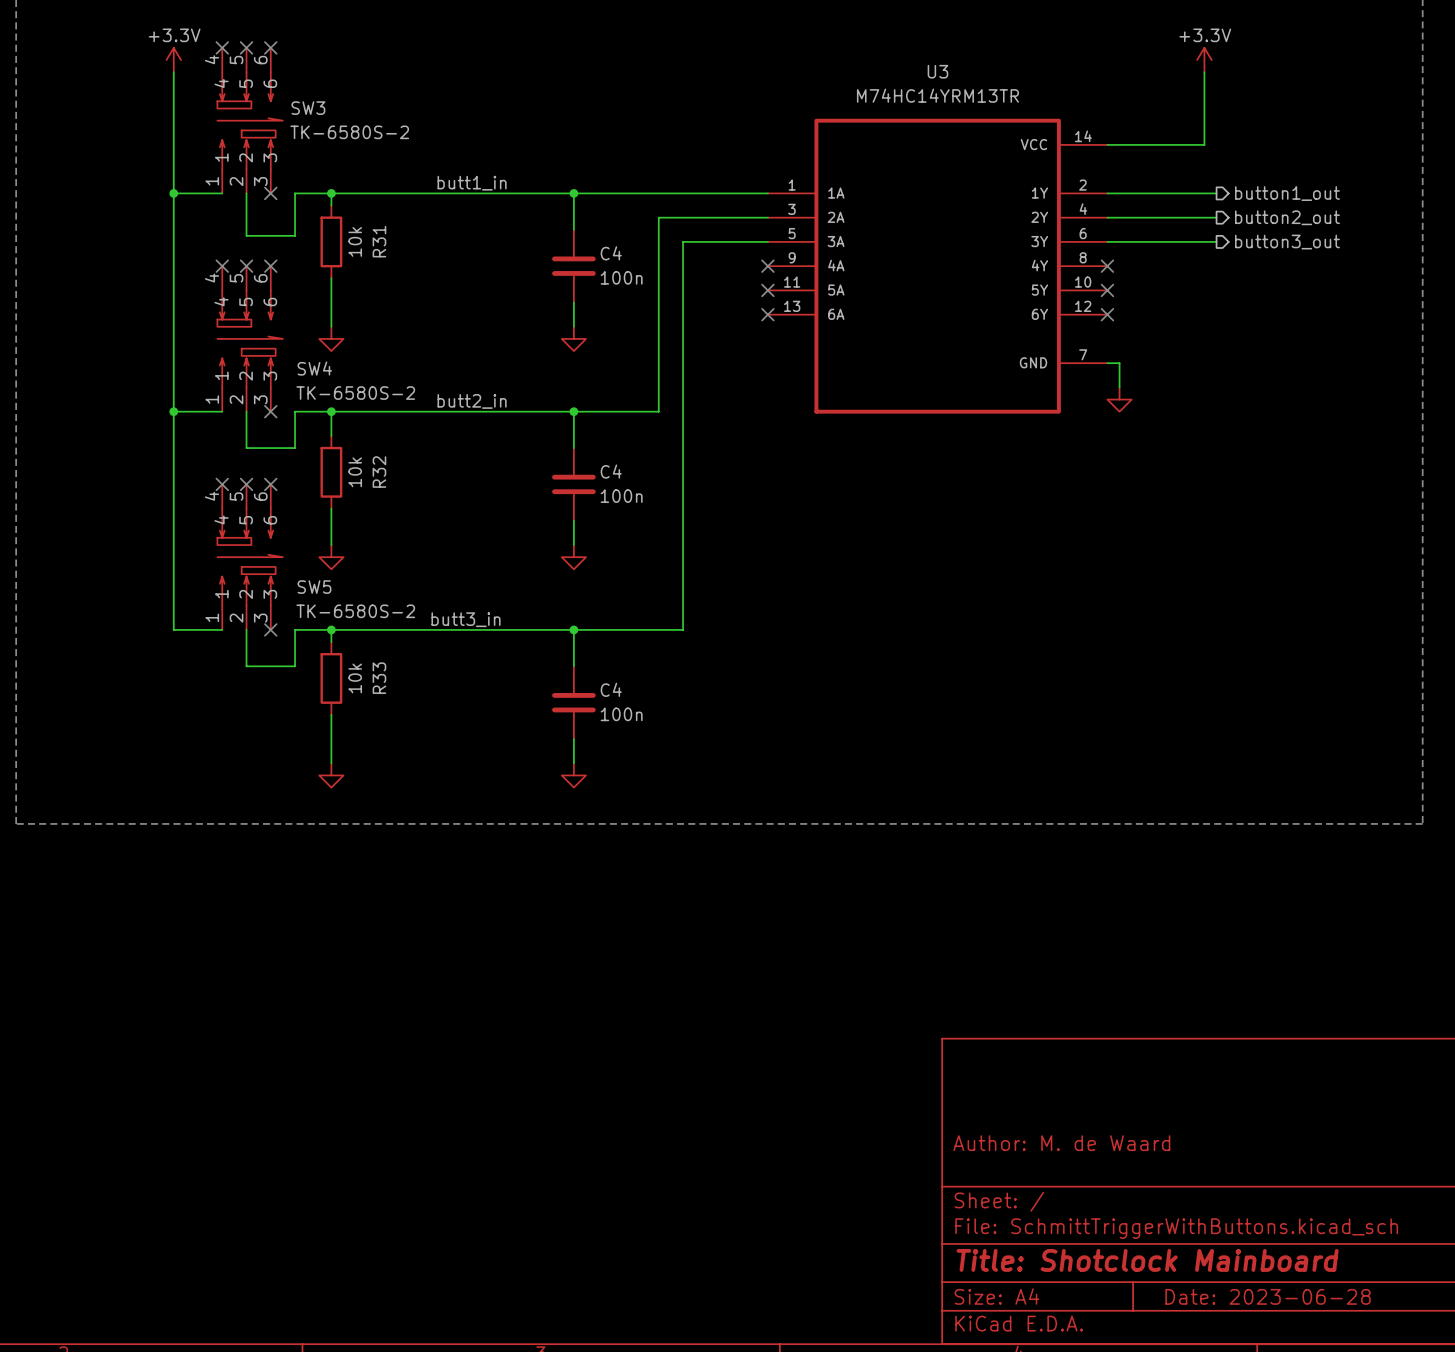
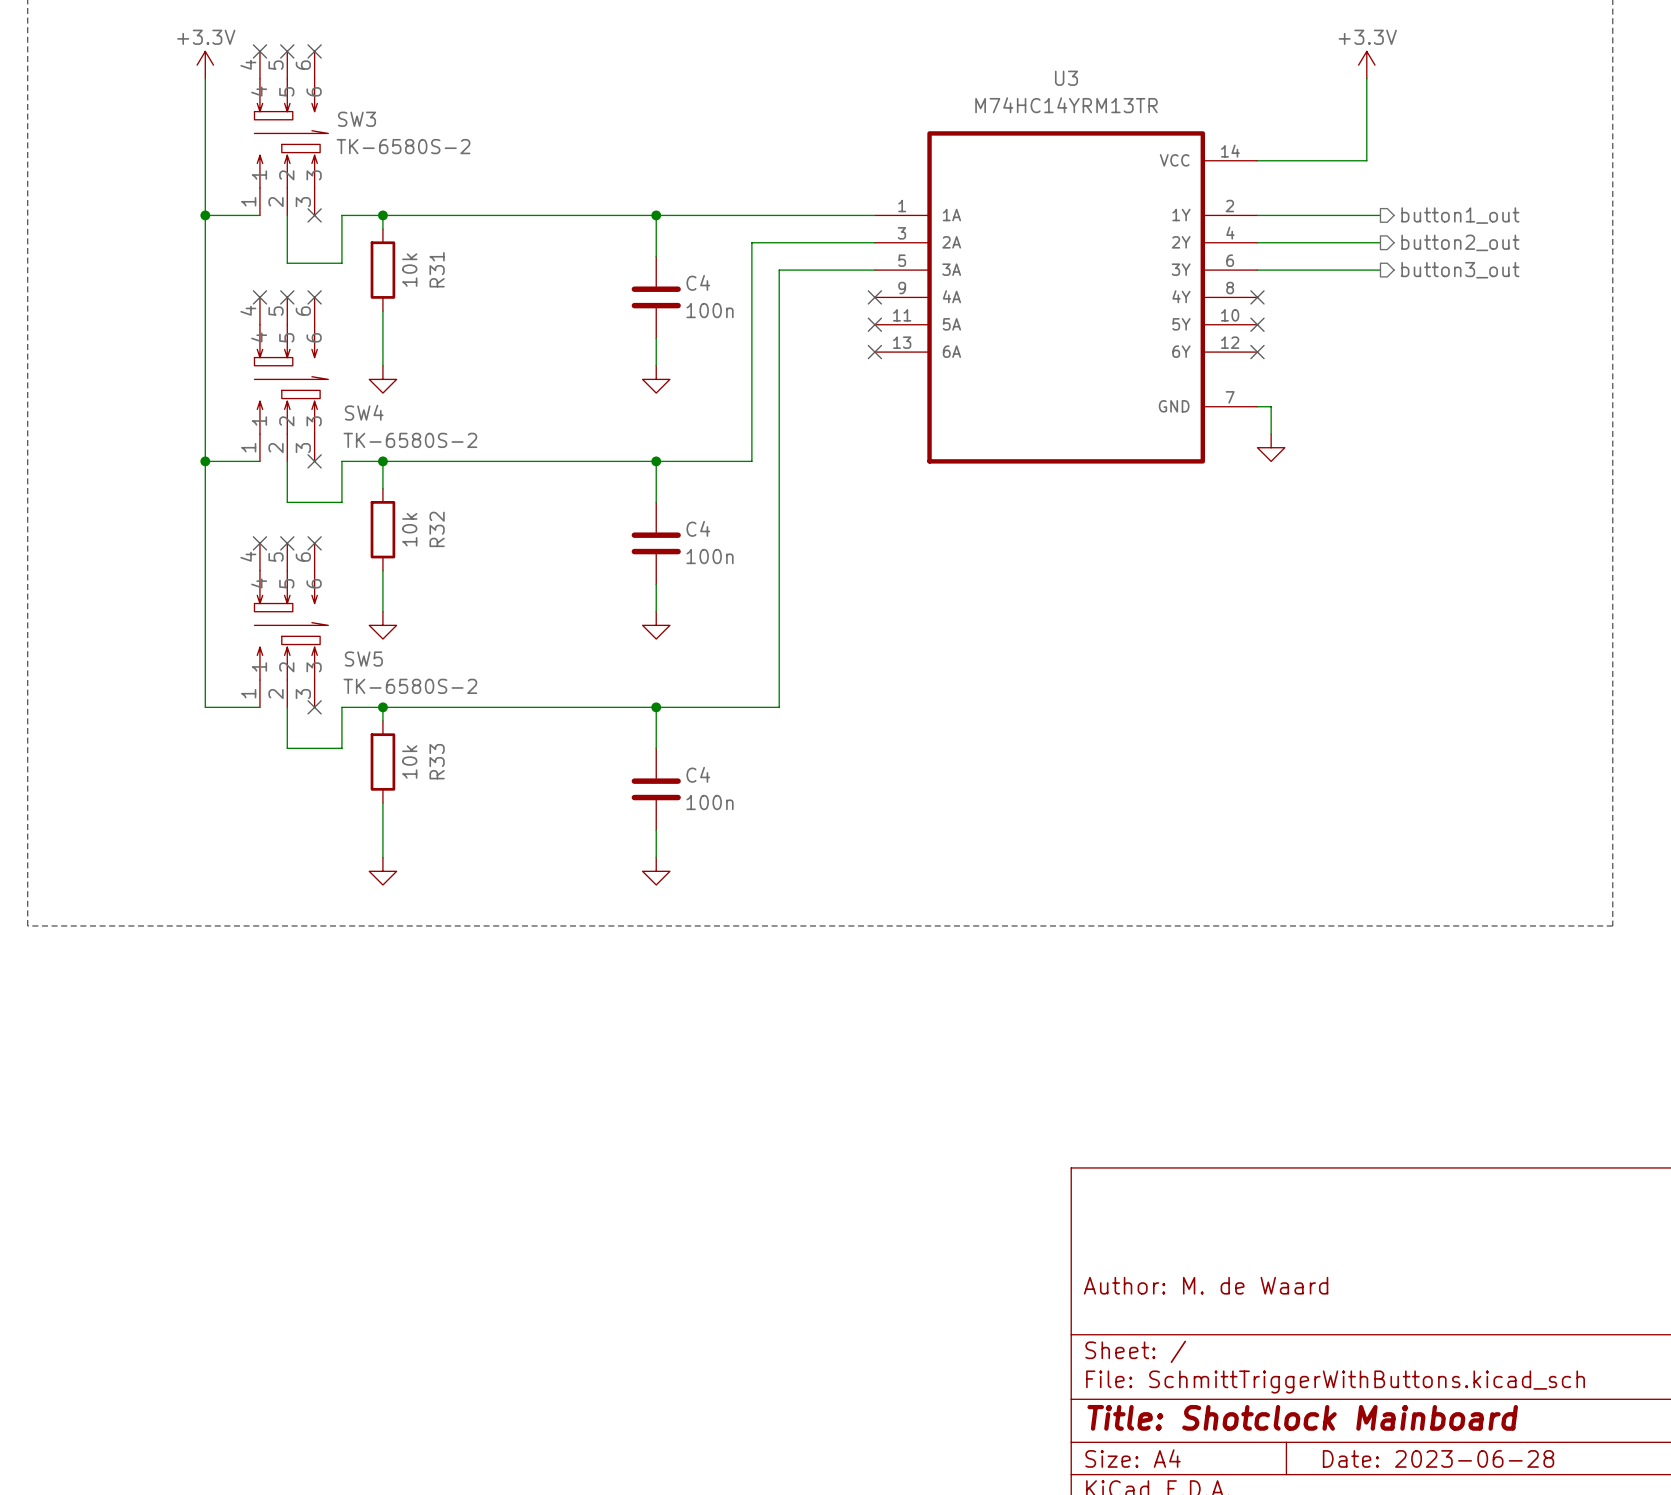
label: butt1_in (472, 183) -> none
label: butt2_in (472, 401) -> none
label: butt3_in (466, 619) -> none

